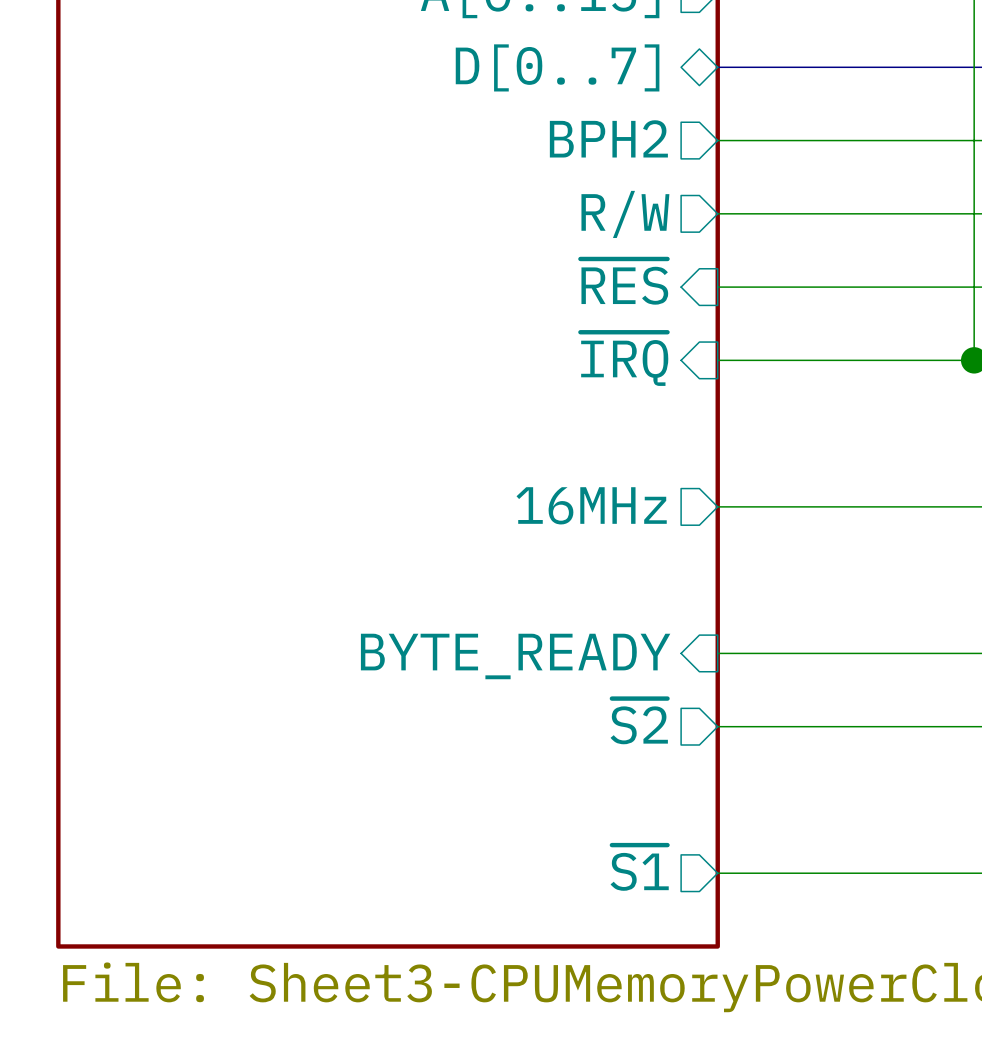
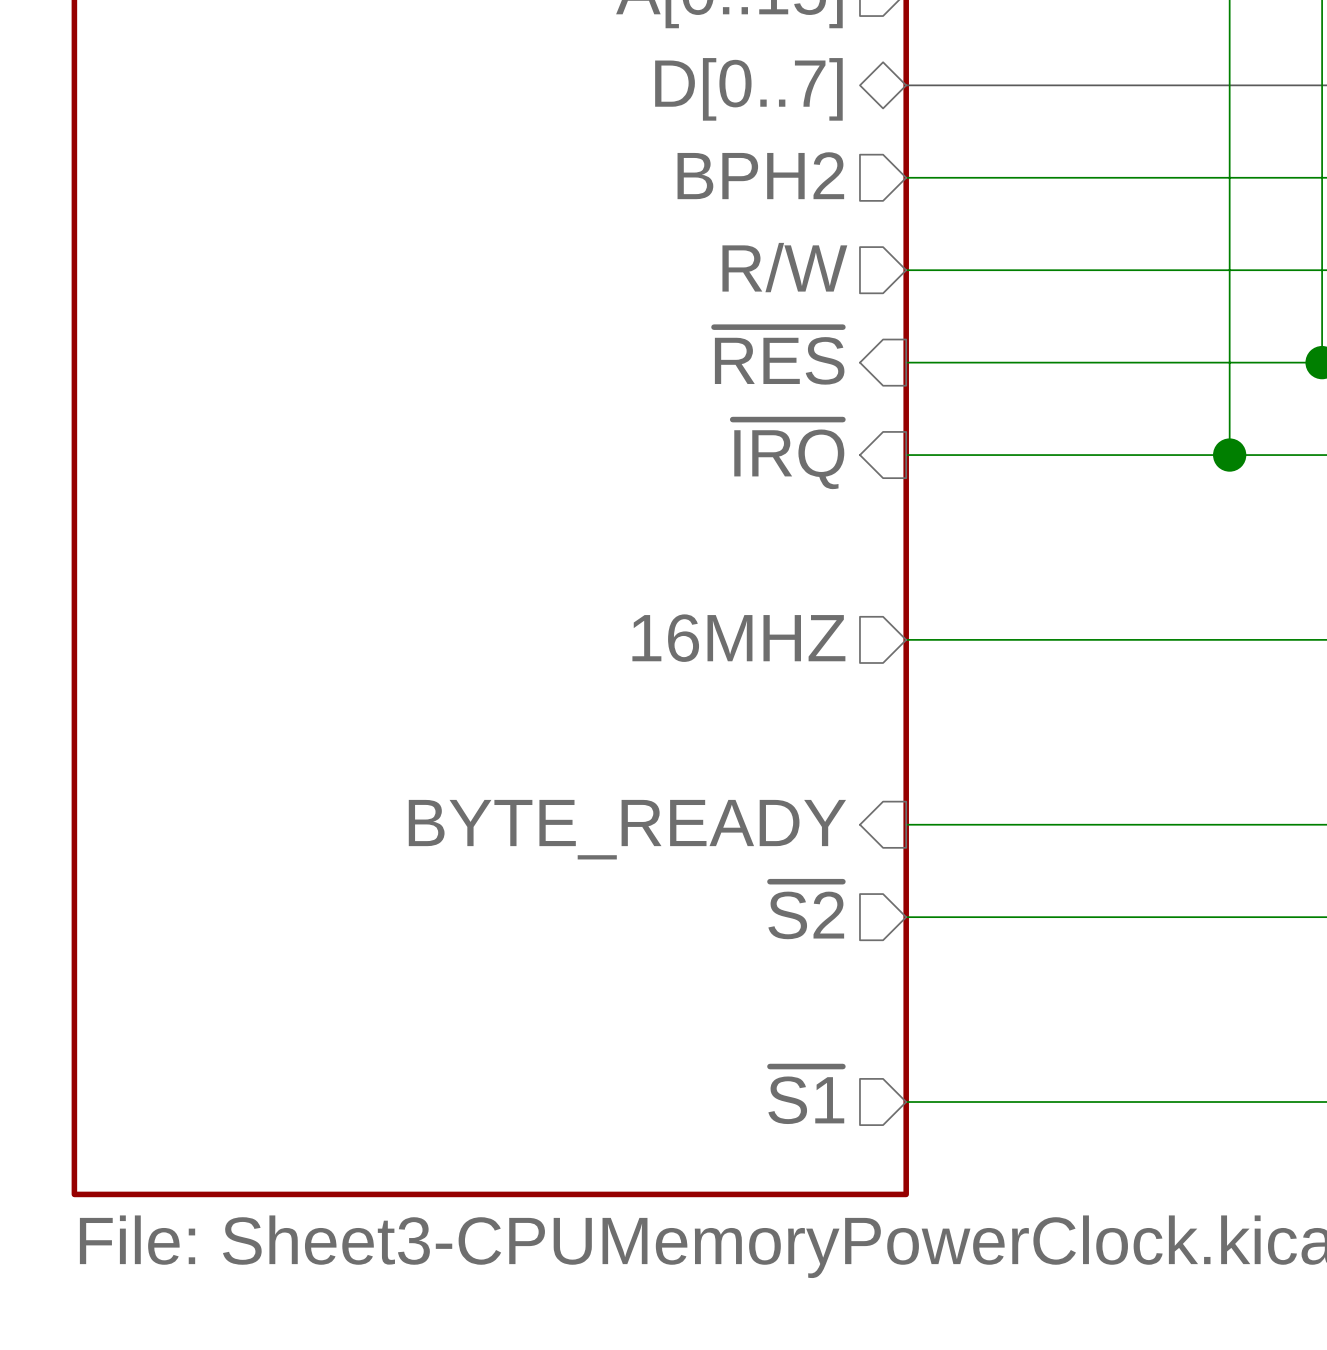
sheet pin: 16MHz (591, 505) -> 16MHZ (738, 638)

